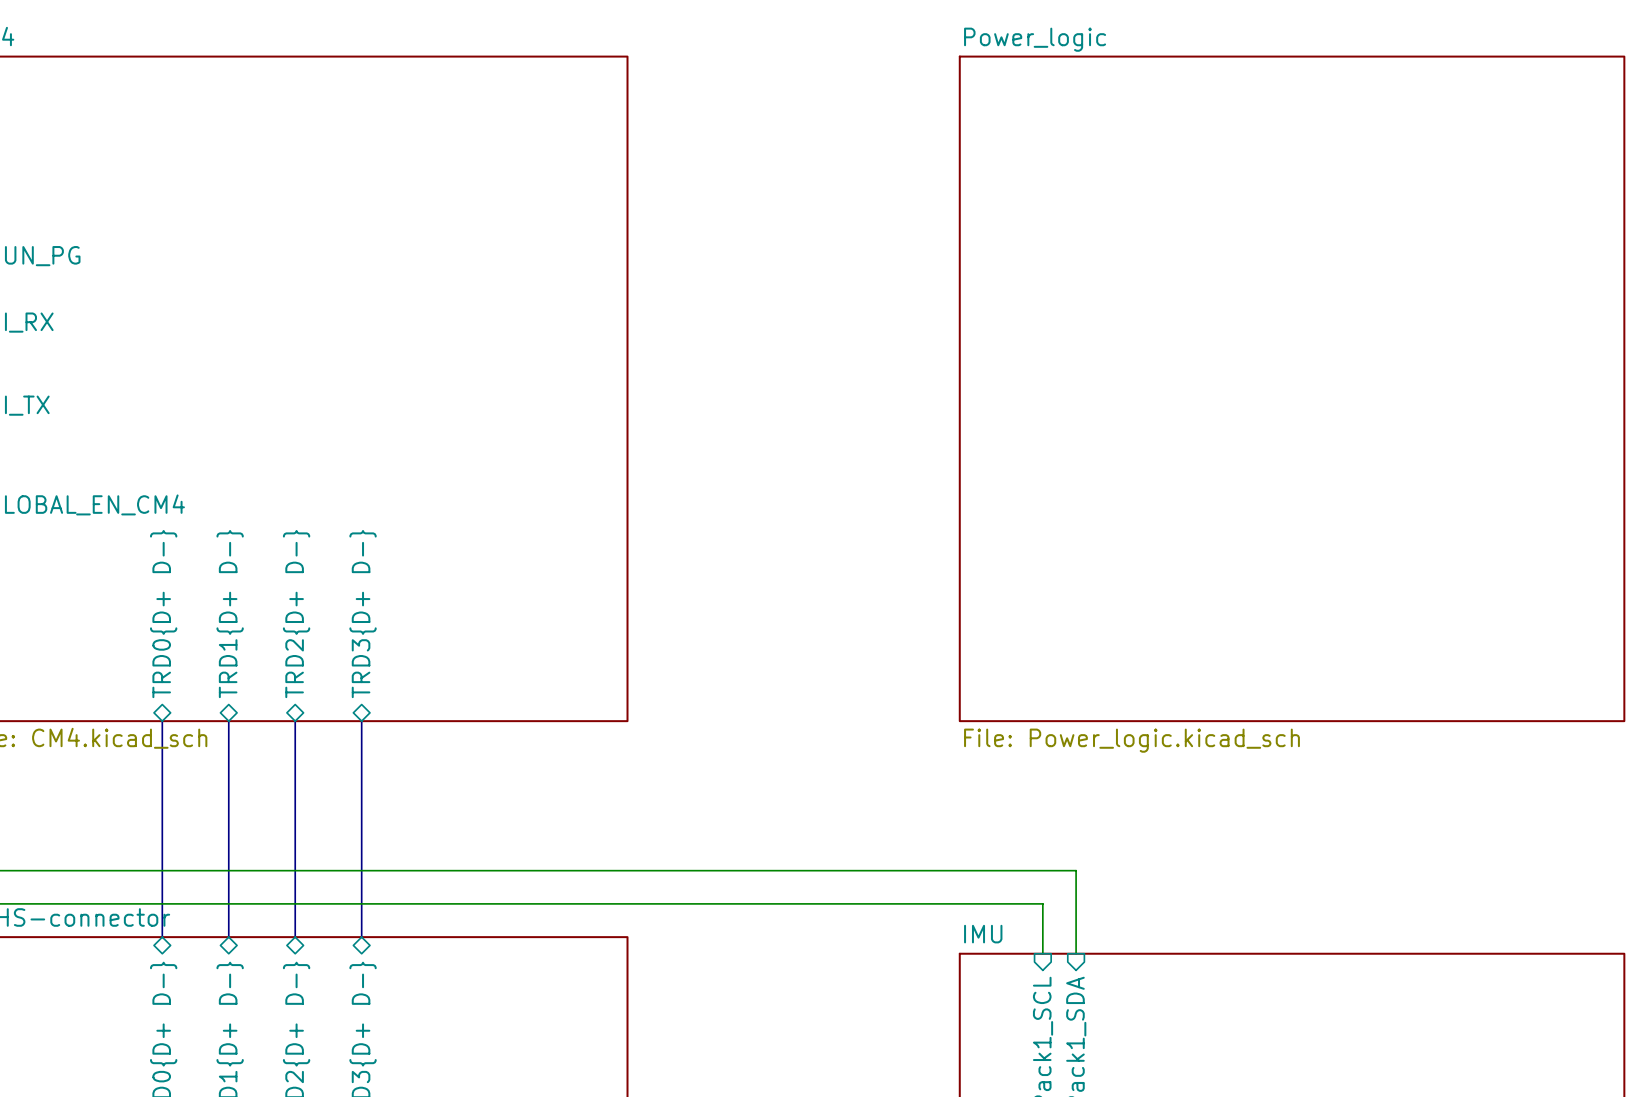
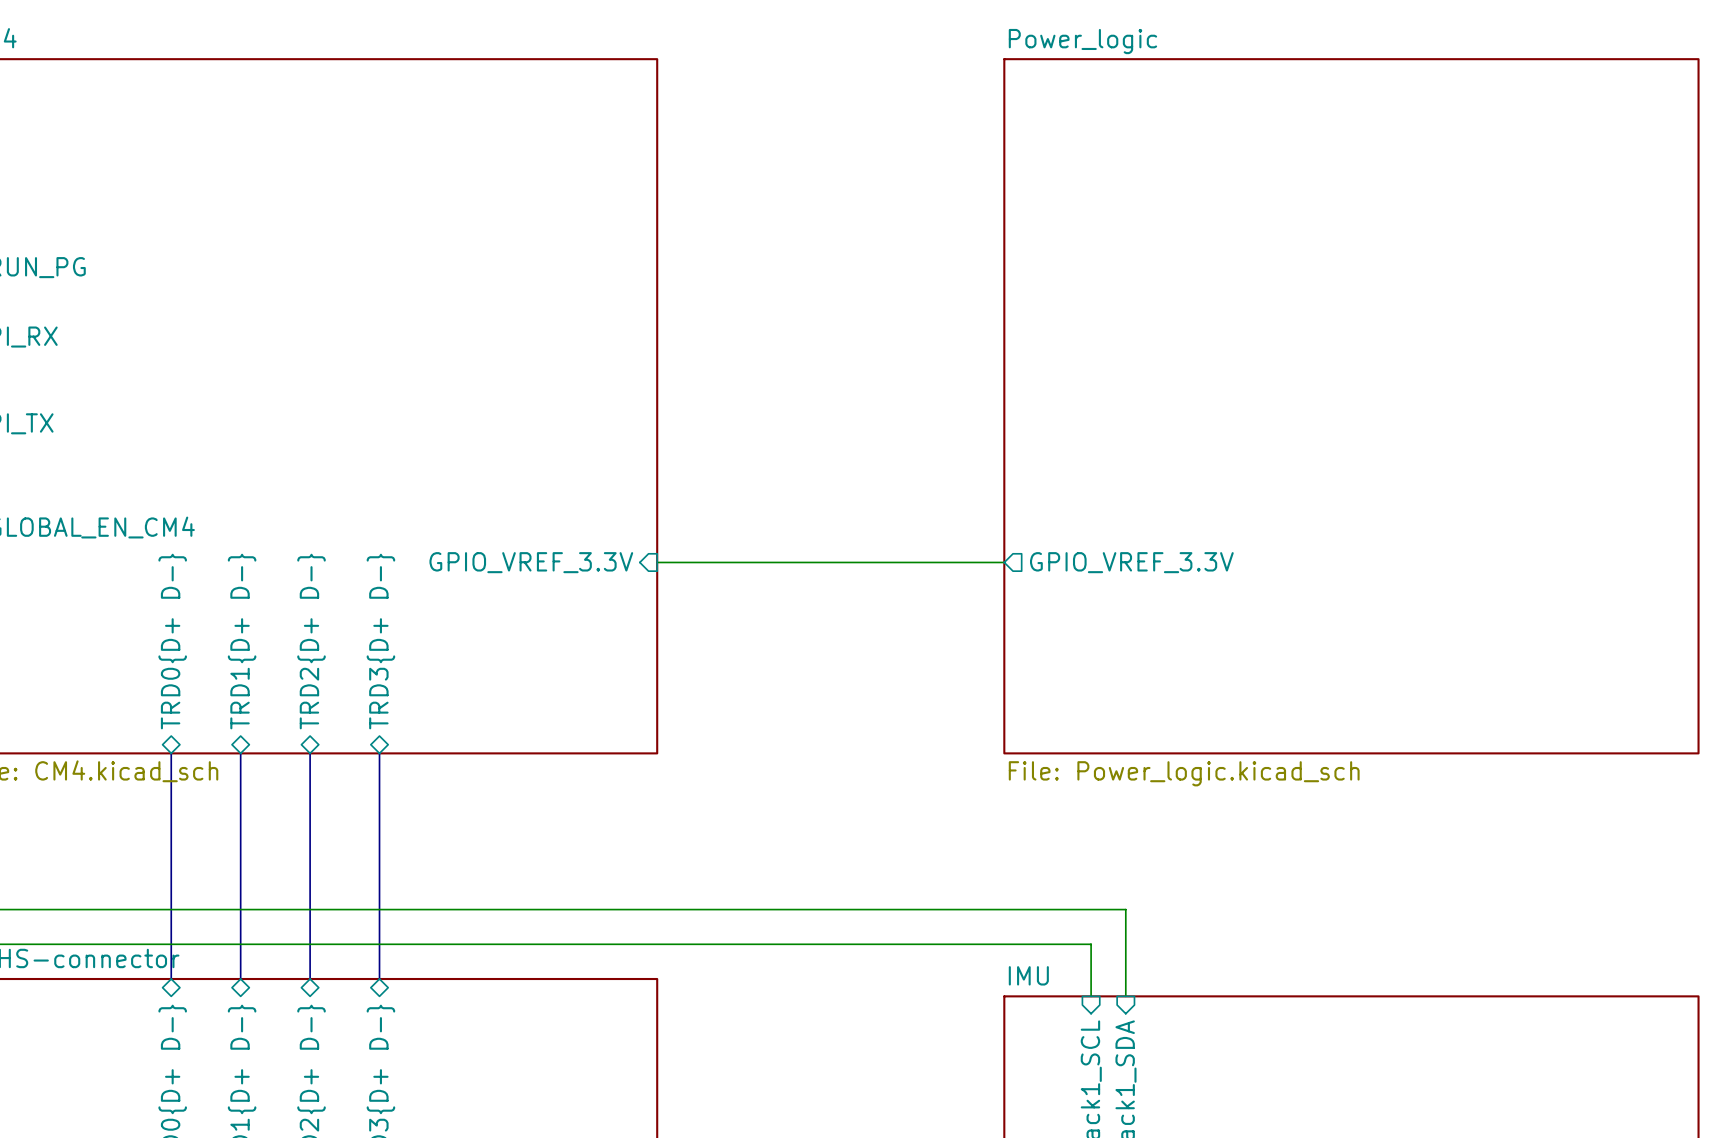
sheet pin: none -> GPIO_VREF_3.3V (531, 562)
wire: none -> (657, 562) (1004, 562)
sheet pin: none -> GPIO_VREF_3.3V (1131, 562)

